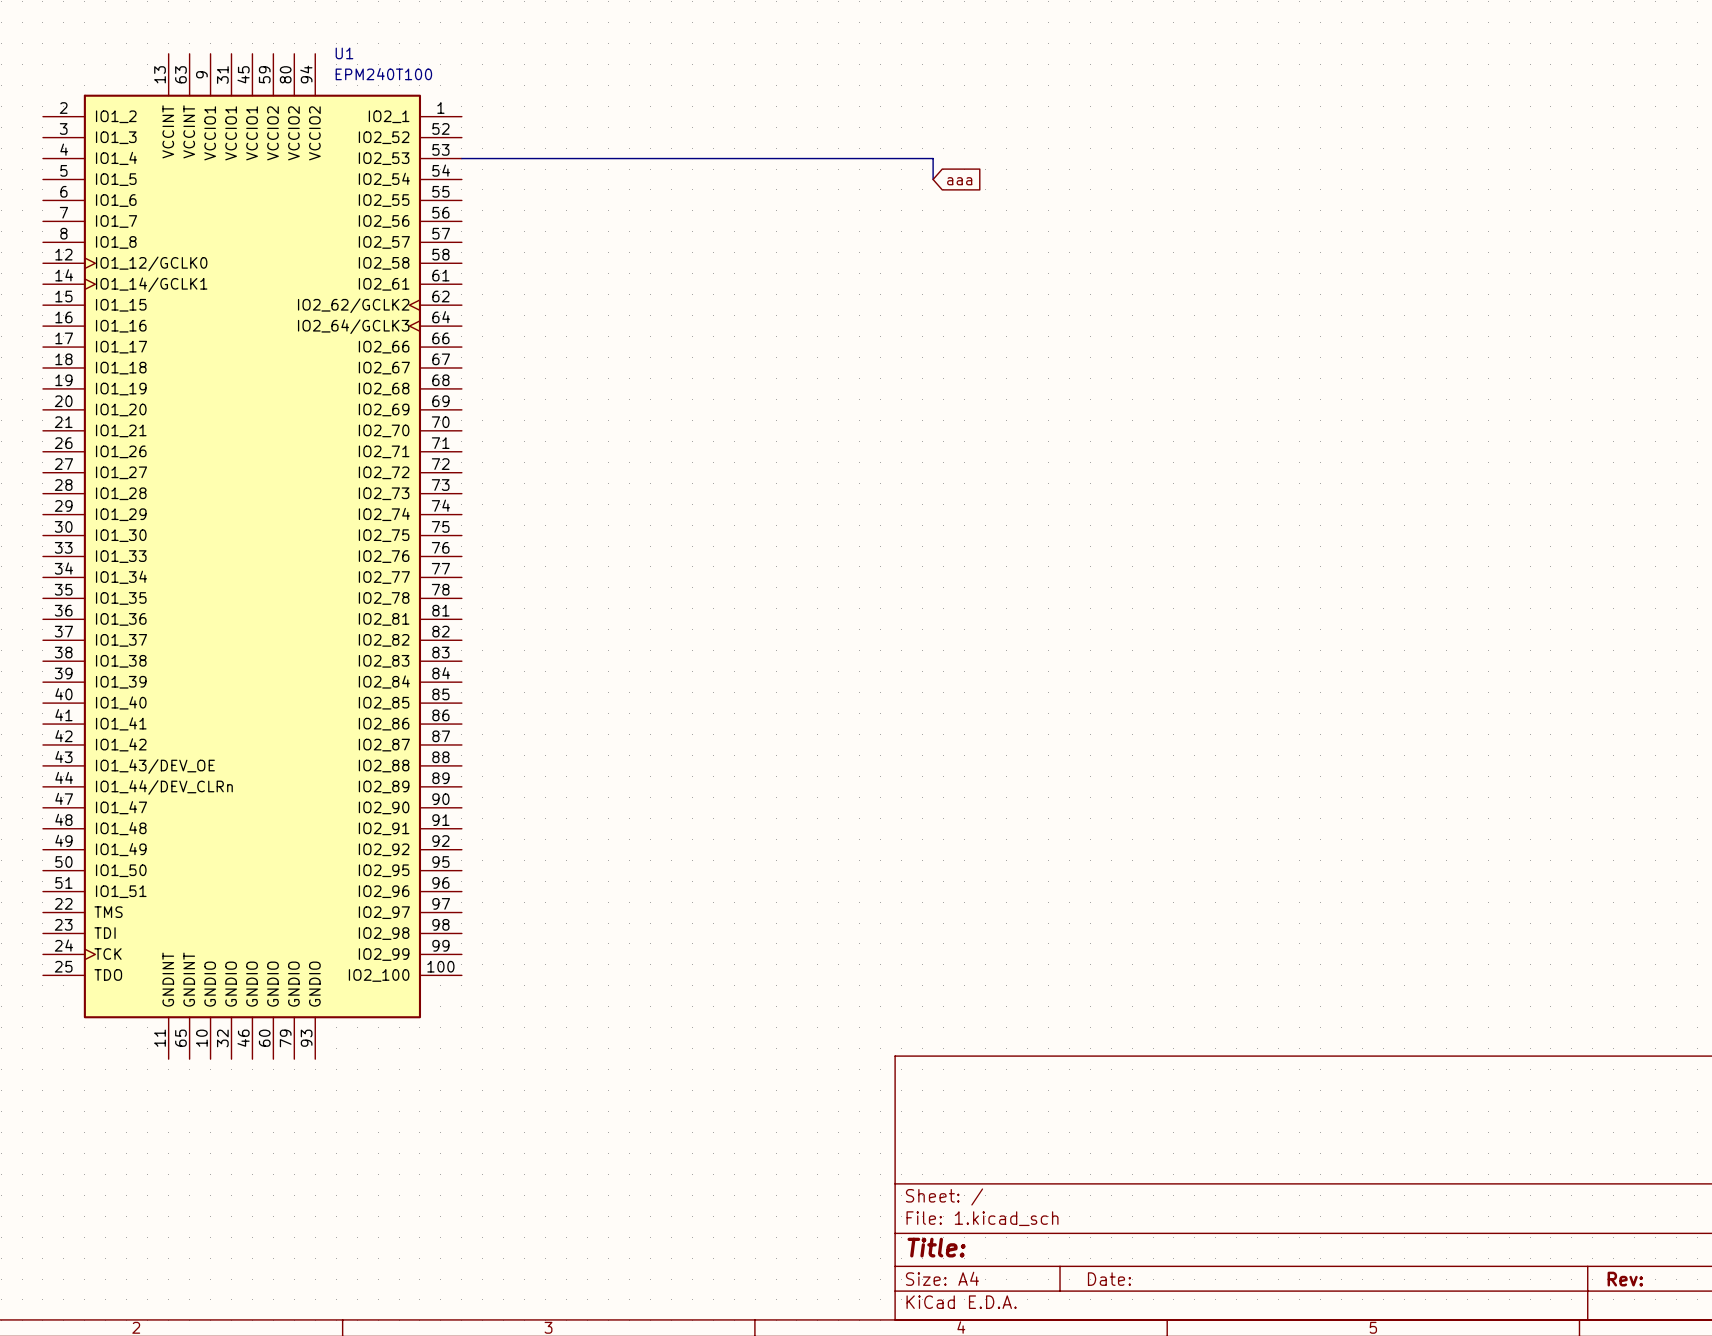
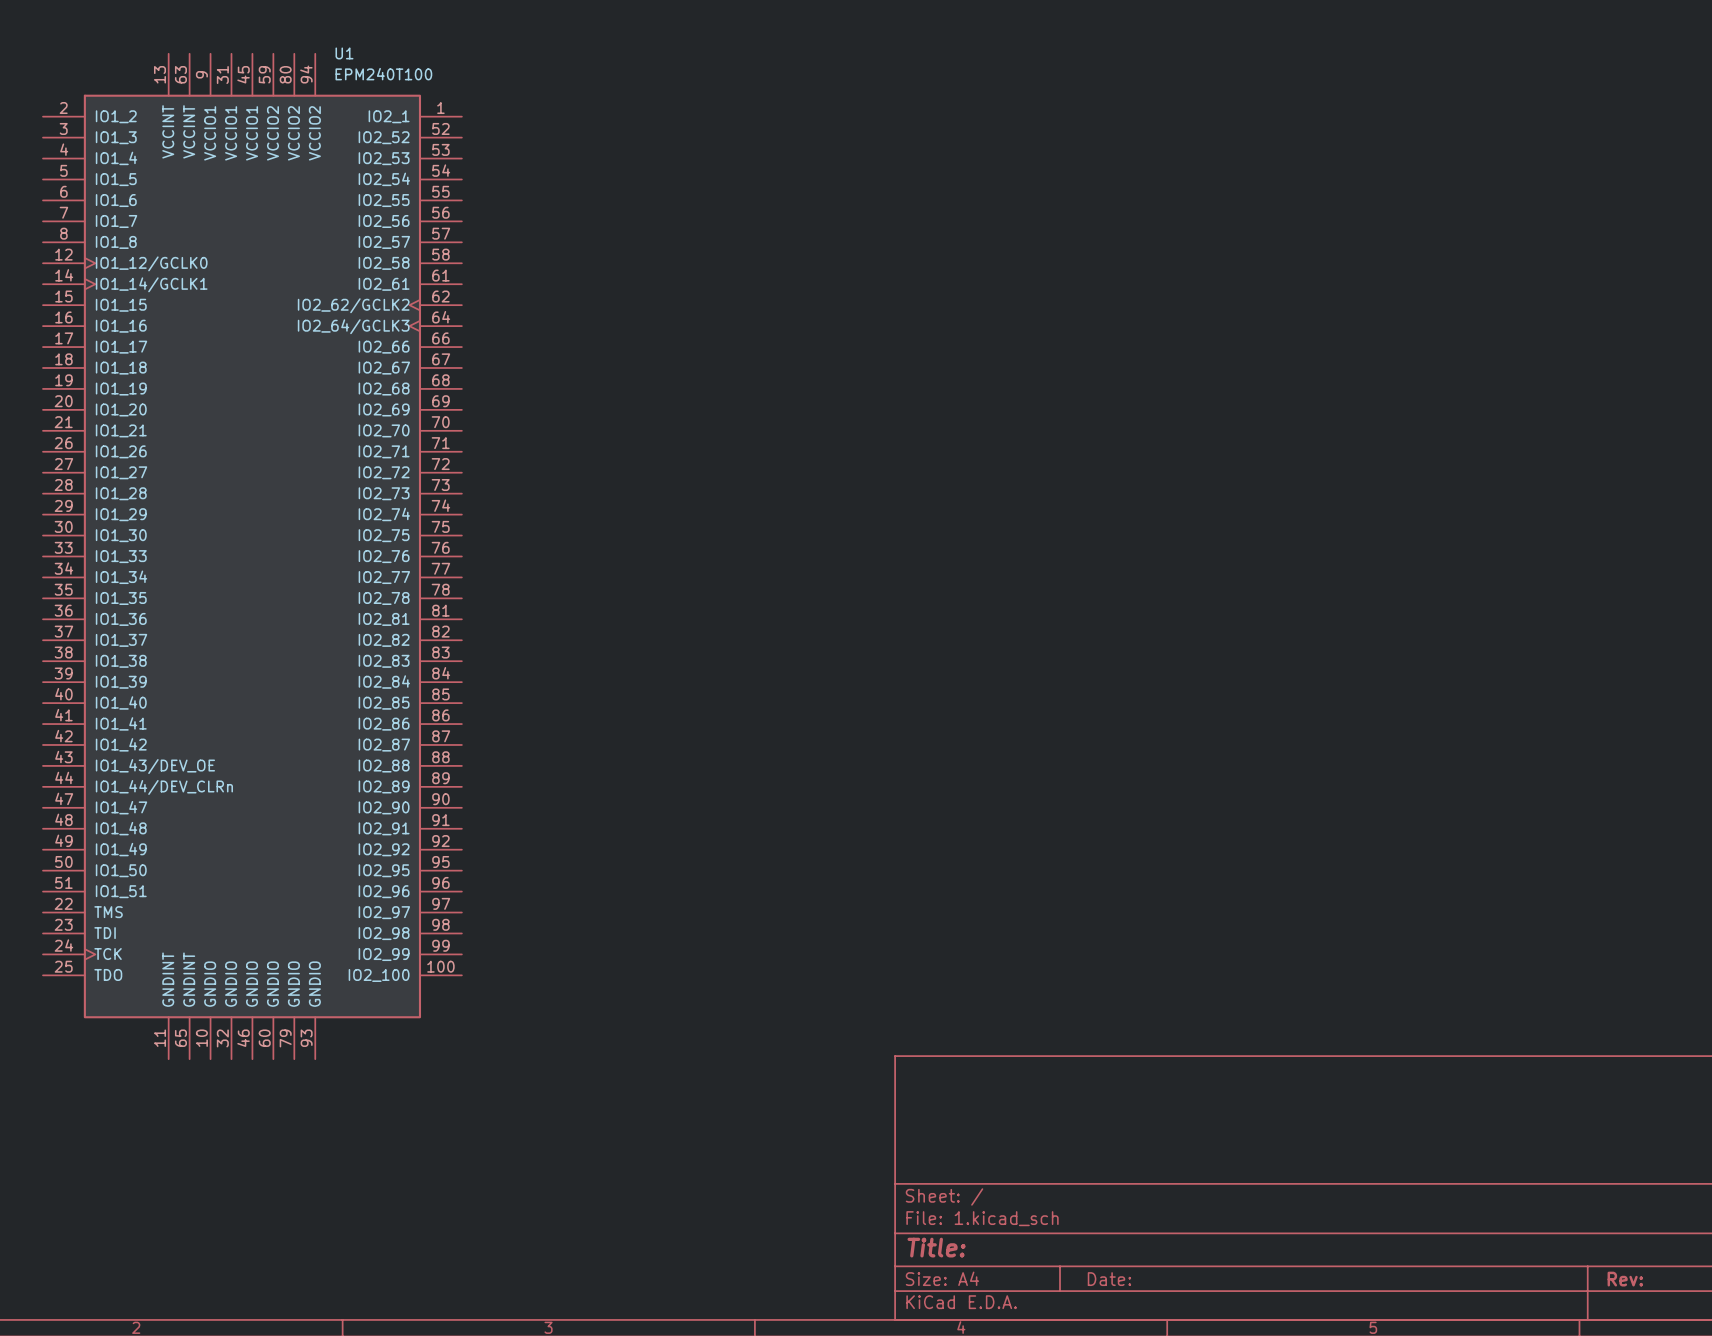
wire: (461, 158) (933, 158) (933, 179) -> none
global label: aaa (959, 181) -> none

